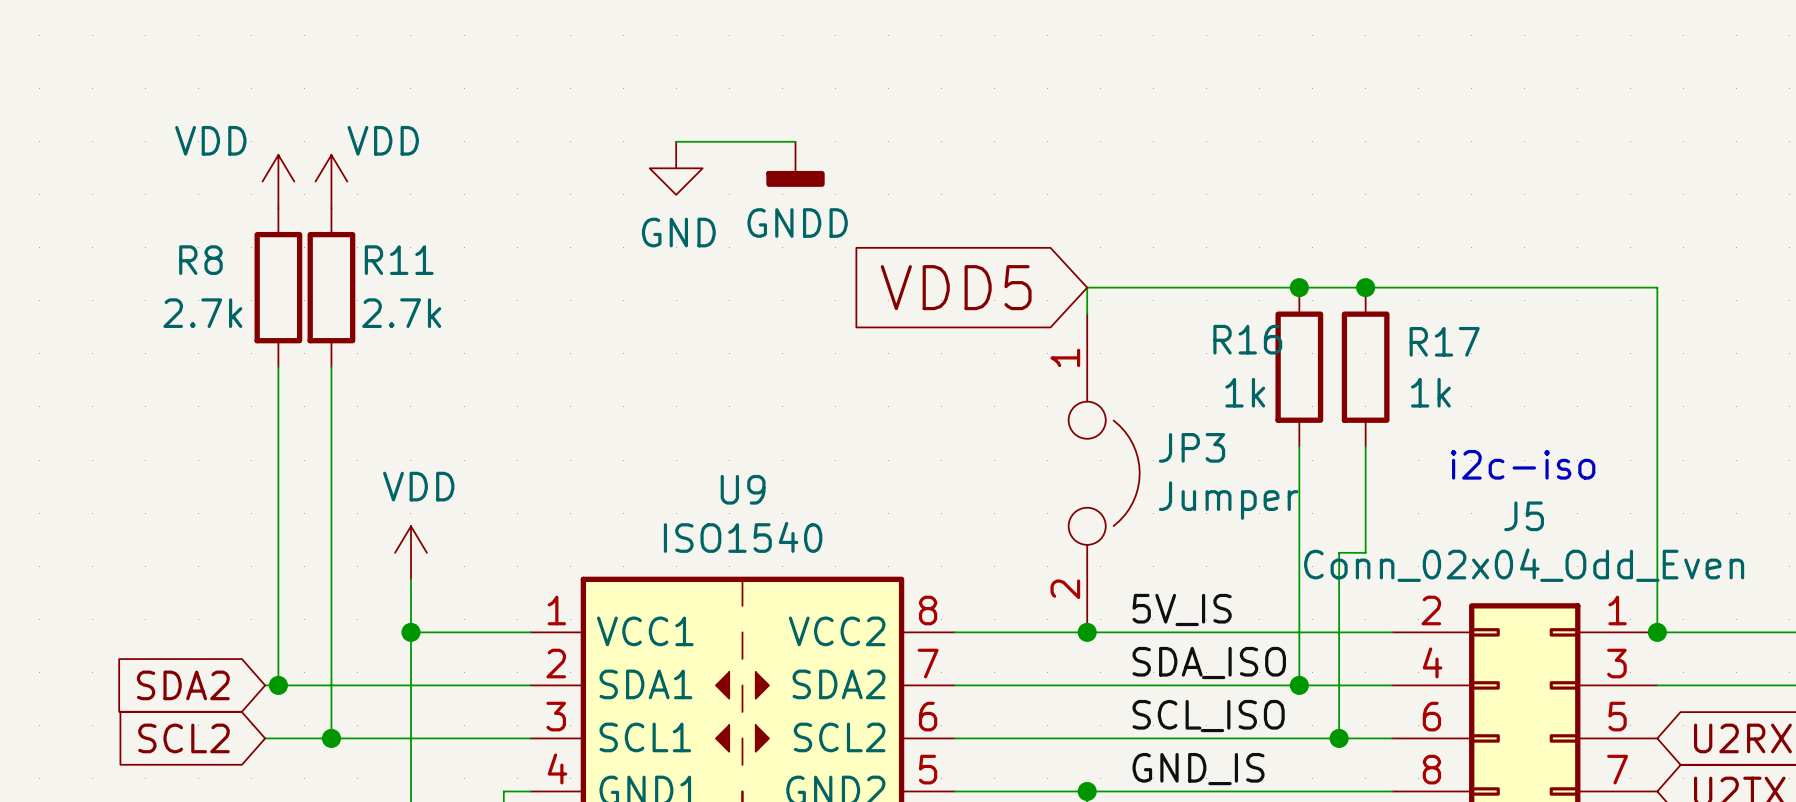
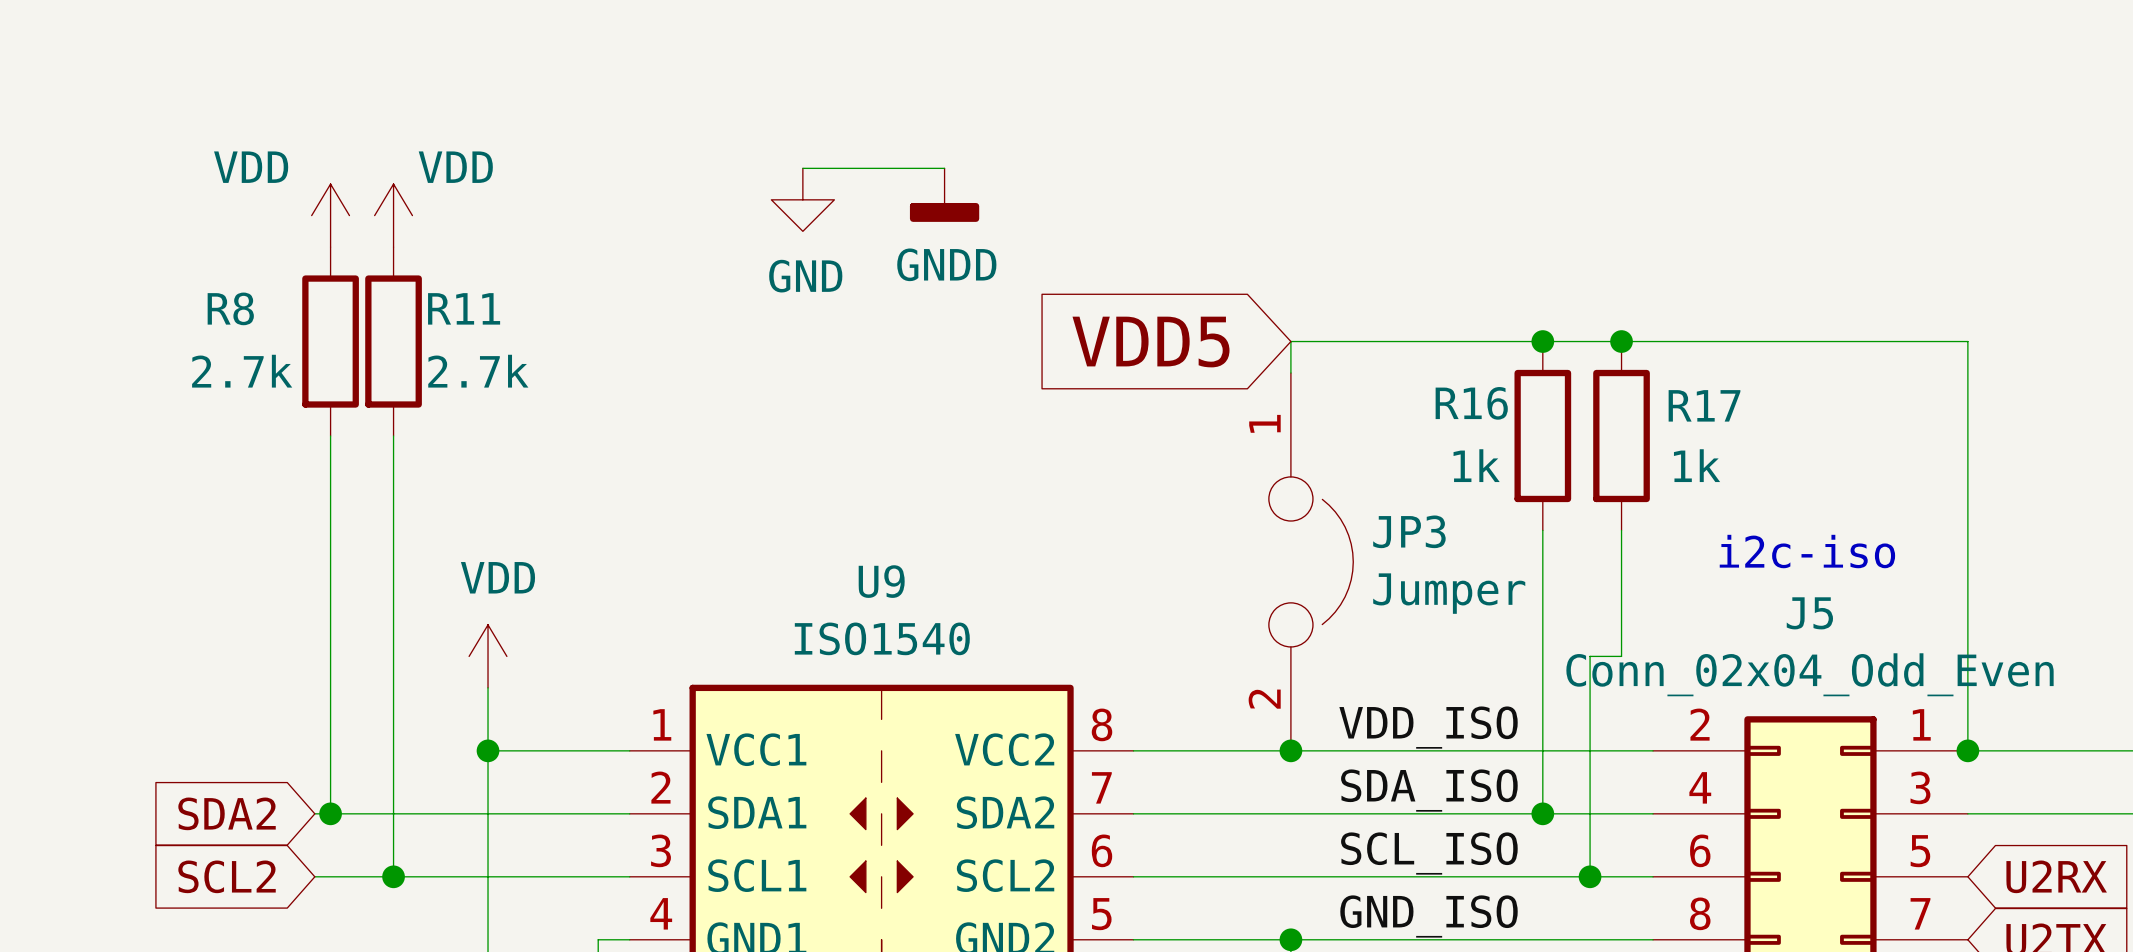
label: 5V_IS (1182, 609) -> VDD_ISO (1428, 727)
label: GND_IS (1198, 769) -> GND_ISO (1429, 916)

